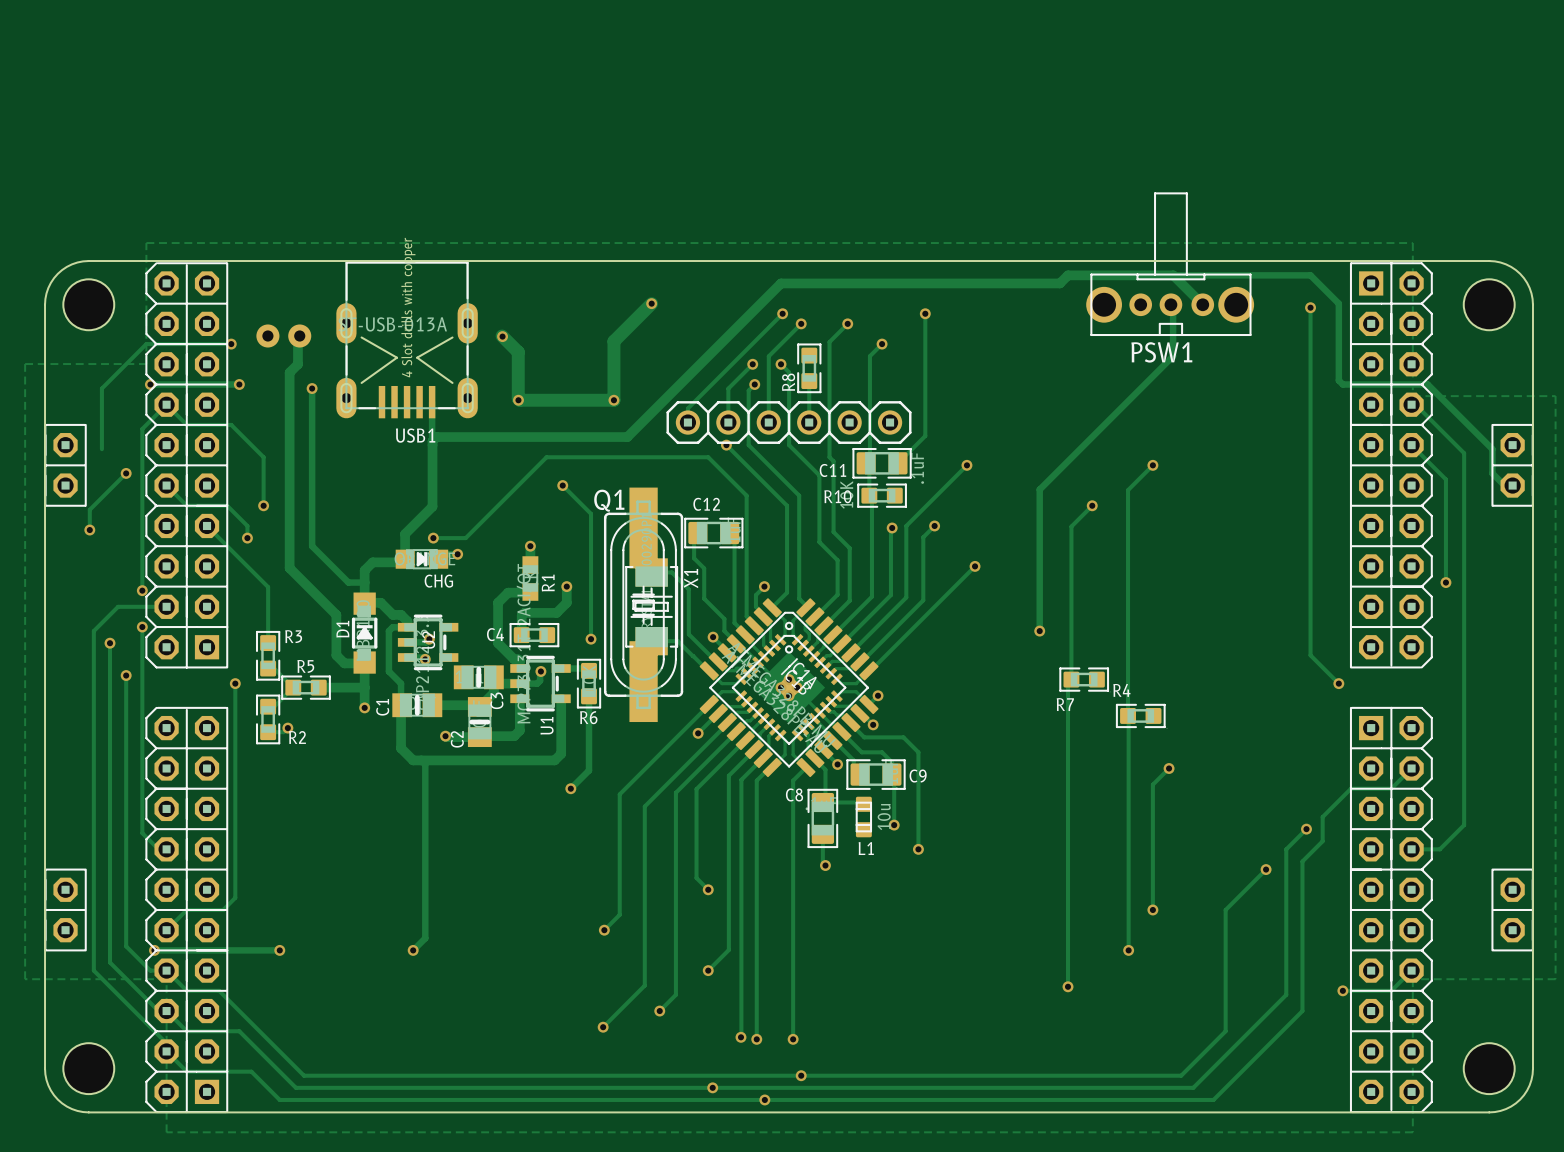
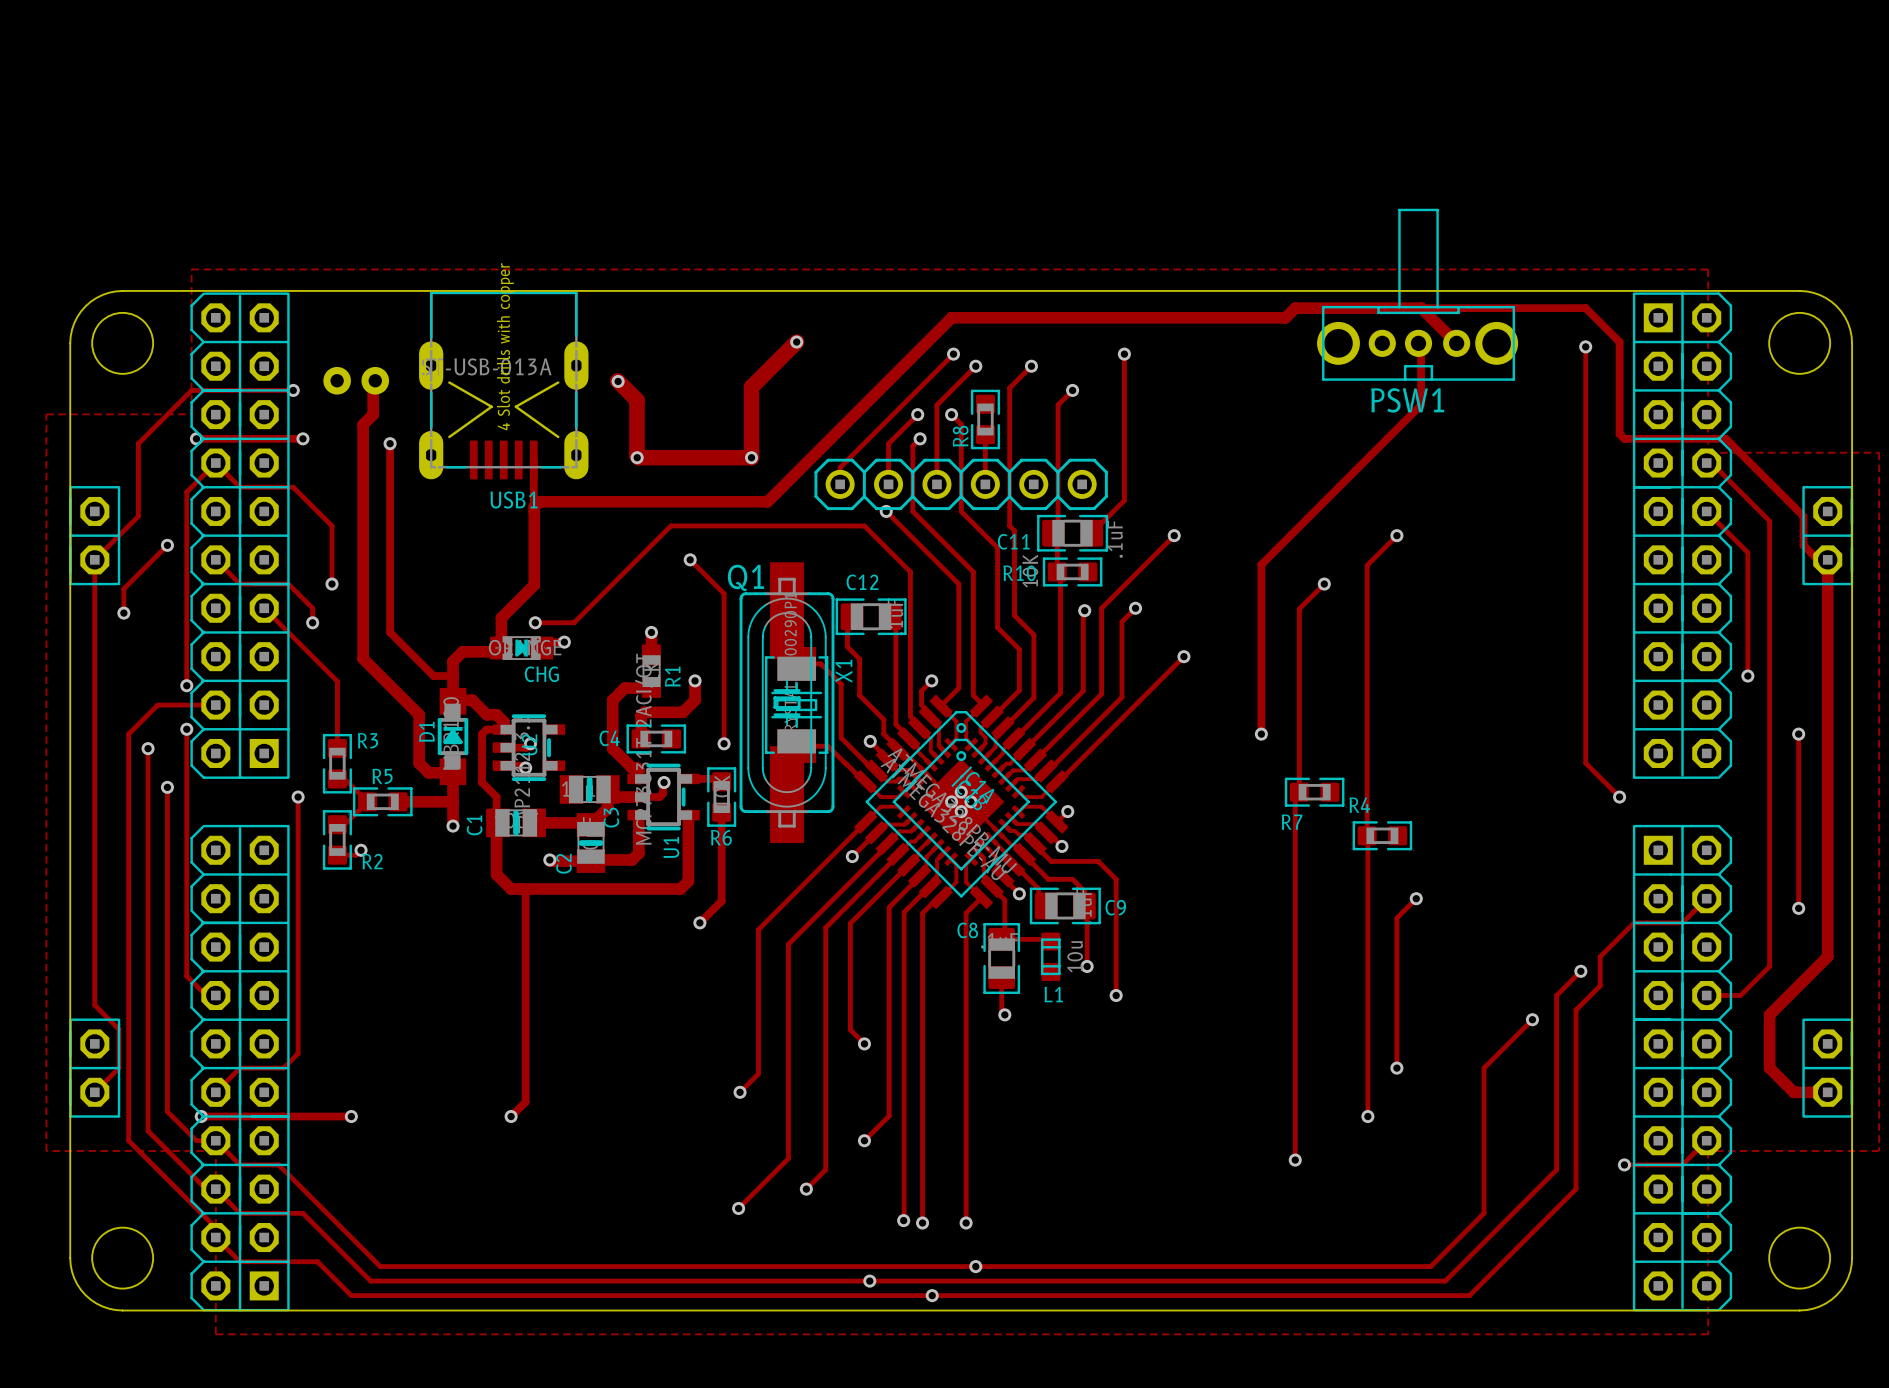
track: none -> (138, 516) (94, 559) (94, 1005) (119, 1029) (119, 1068) (94, 1092)
track: none -> (1818, 559) (1827, 559) (1827, 956) (1769, 1014) (1769, 1068) (1793, 1092) (1827, 1092)
track: none -> (1798, 734) (1798, 908)
via: none -> (1798, 734)
via: none -> (1798, 908)

